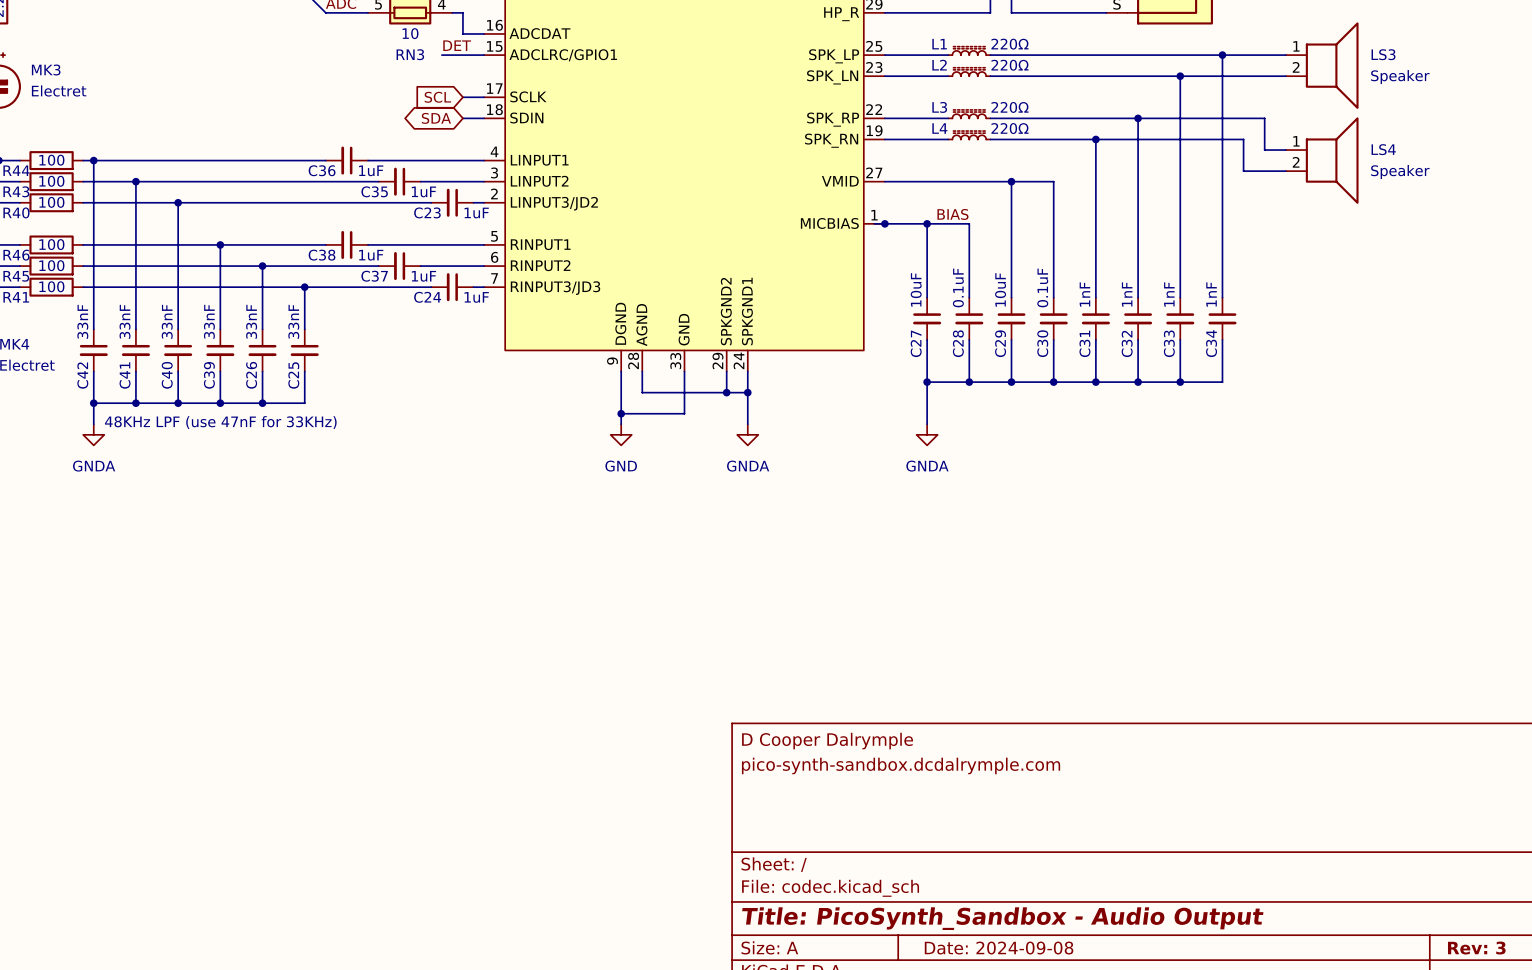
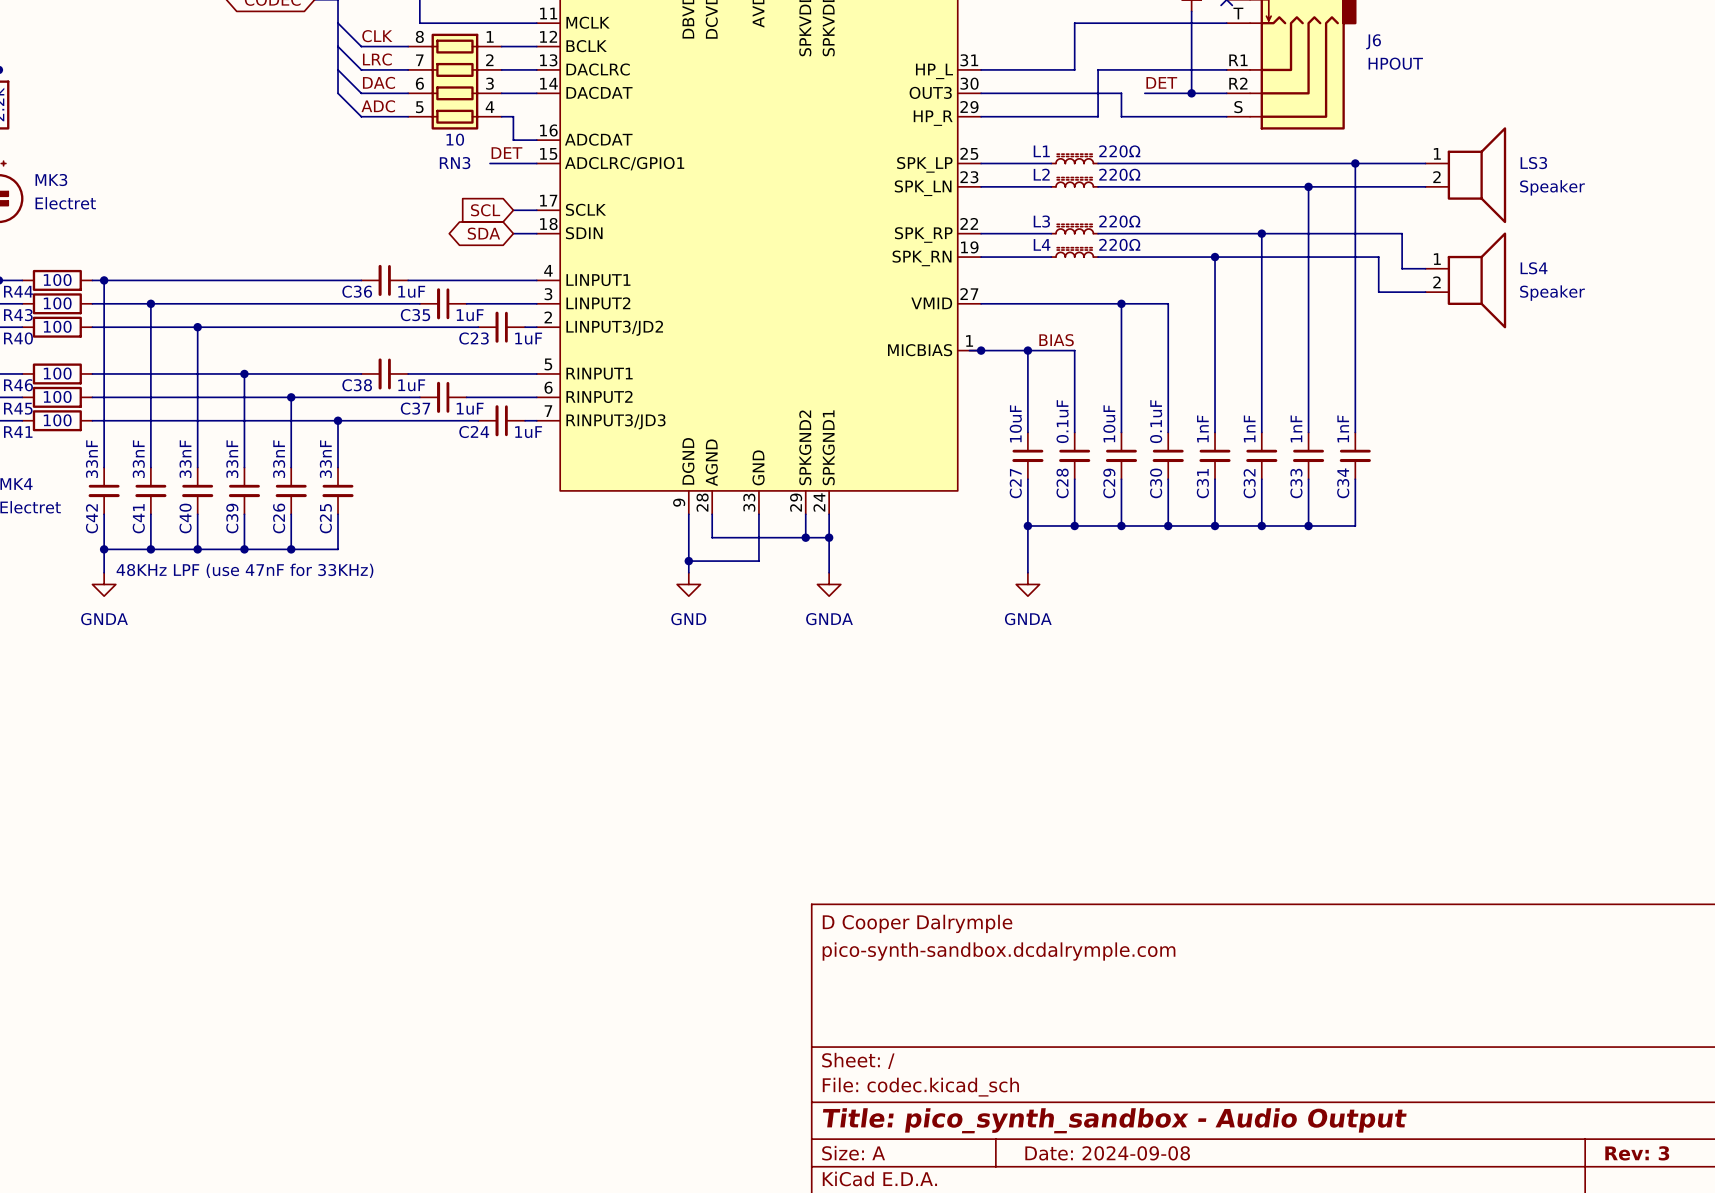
title block: Title: PicoSynth_Sandbox - Audio Output (1002, 918) -> Title: pico_synth_sandbox - Audio Output (1114, 1120)

